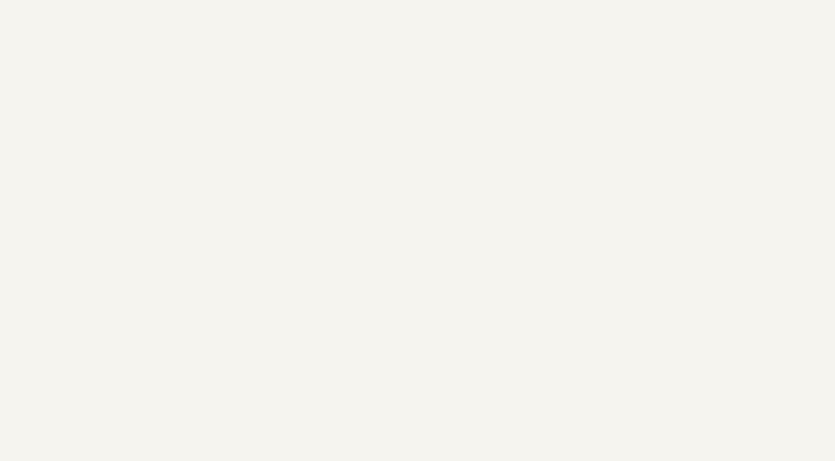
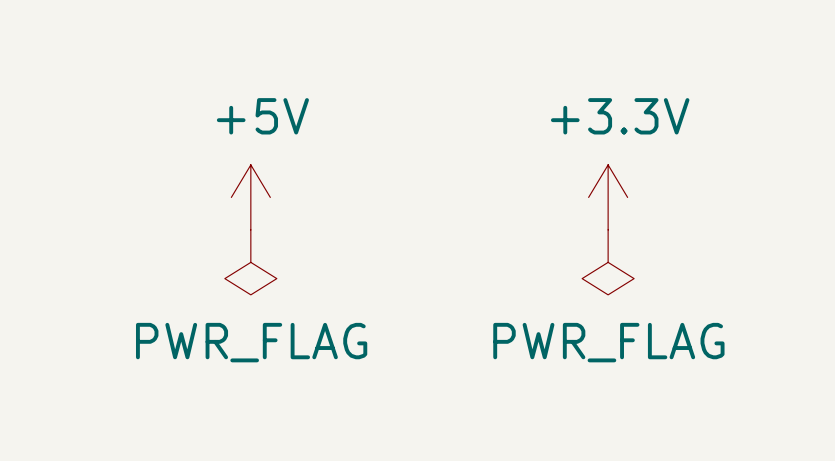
power symbol: none -> +5V (250, 197)
power symbol: none -> +3.3V (608, 197)
power symbol: none -> PWR_FLAG (250, 262)
power symbol: none -> PWR_FLAG (608, 262)

